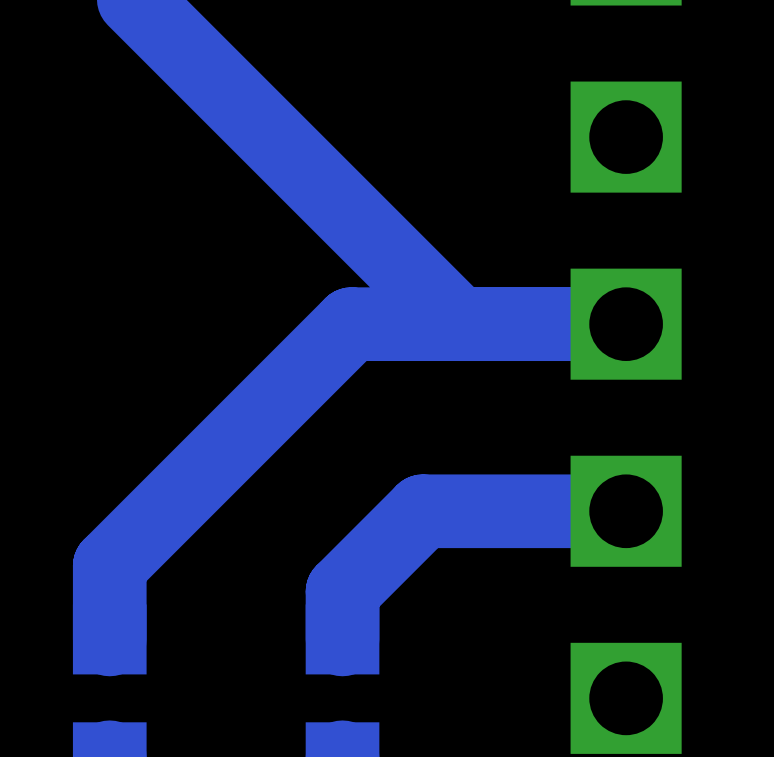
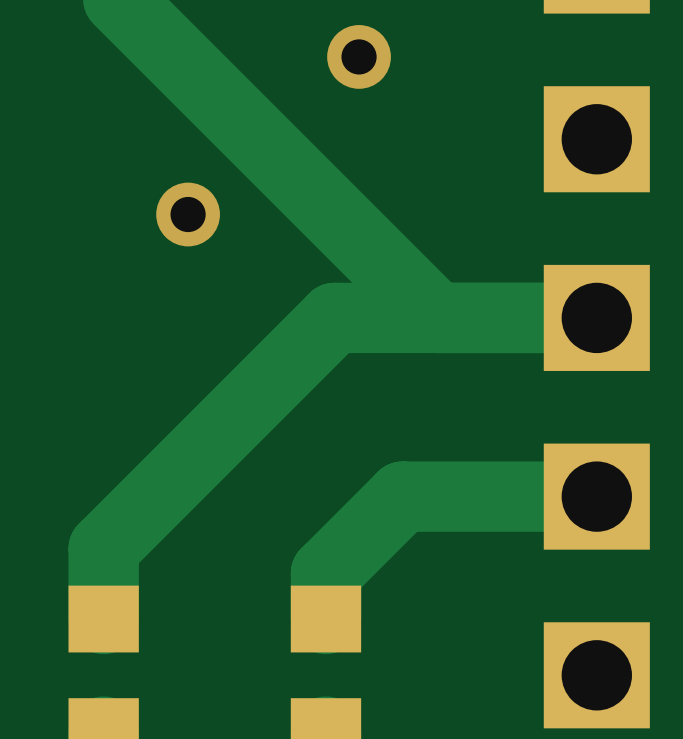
via: none -> (359, 56)
via: none -> (188, 214)

